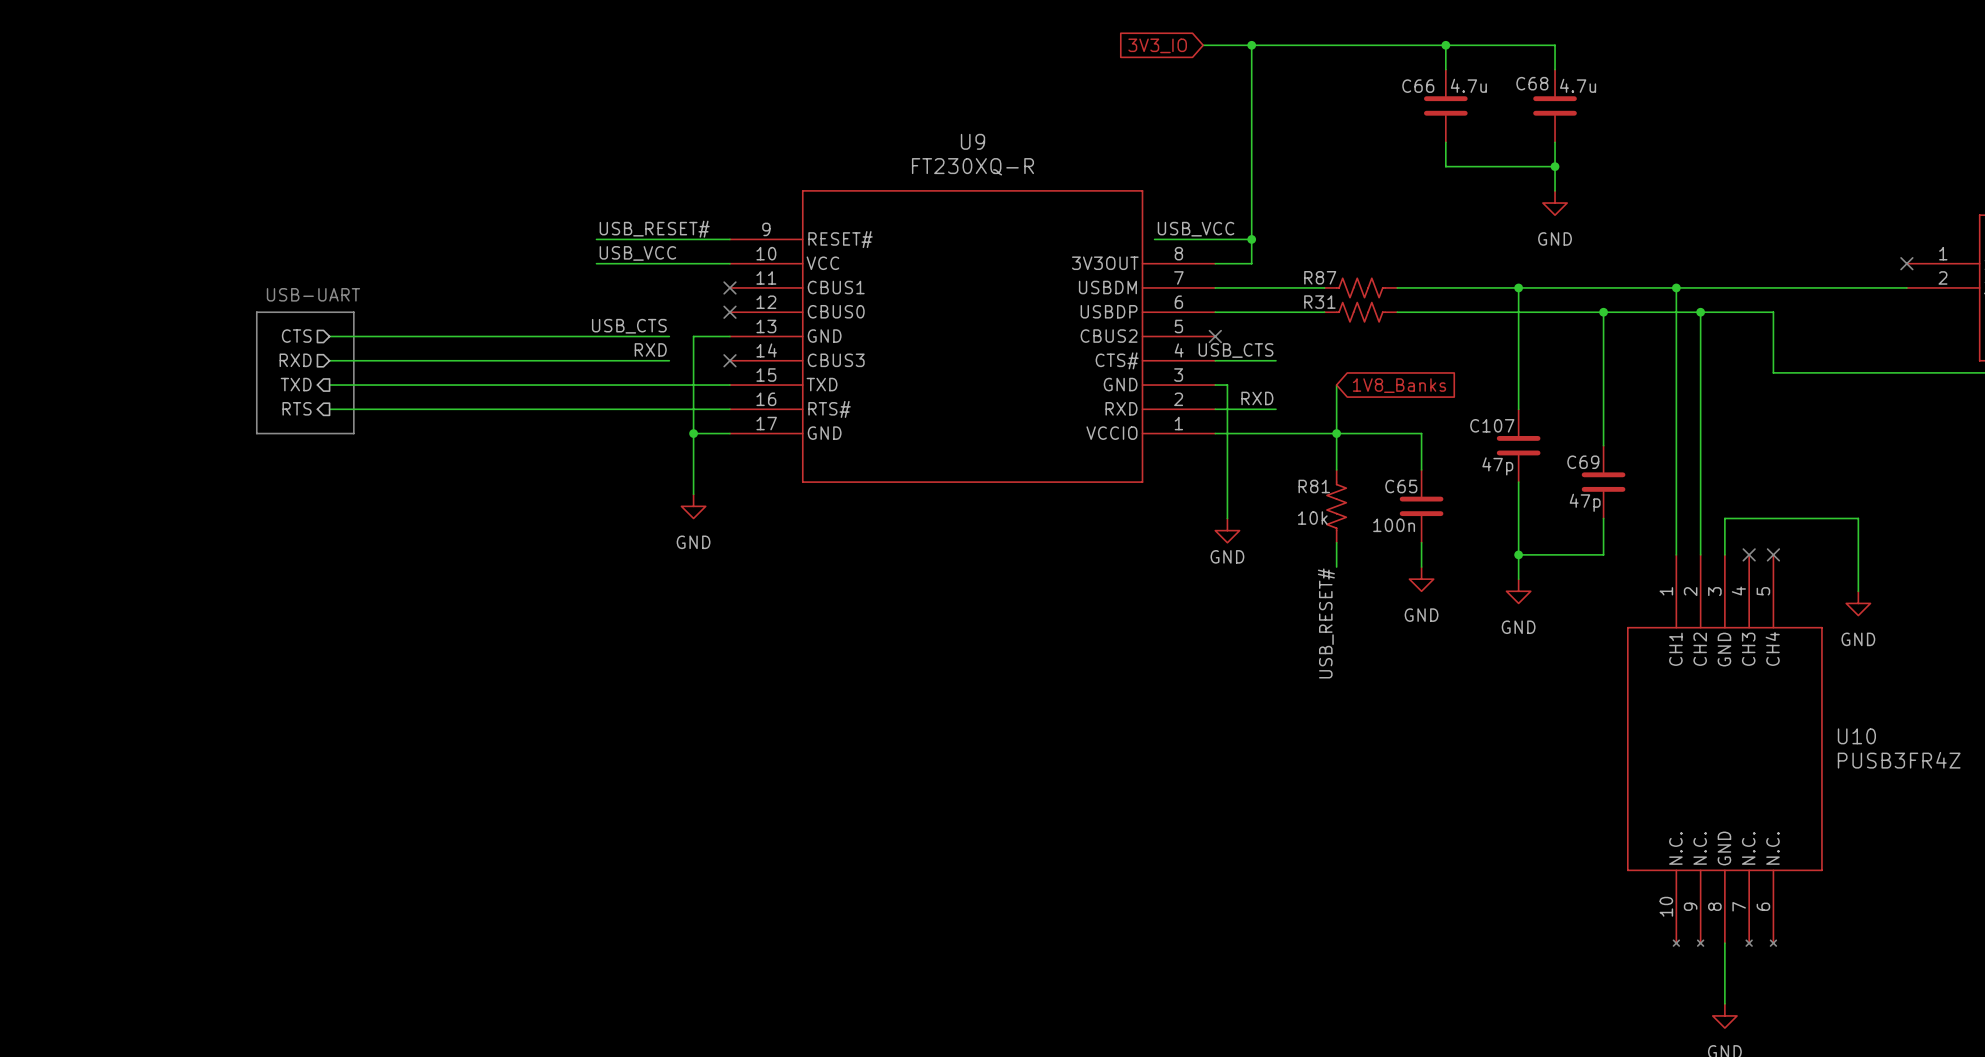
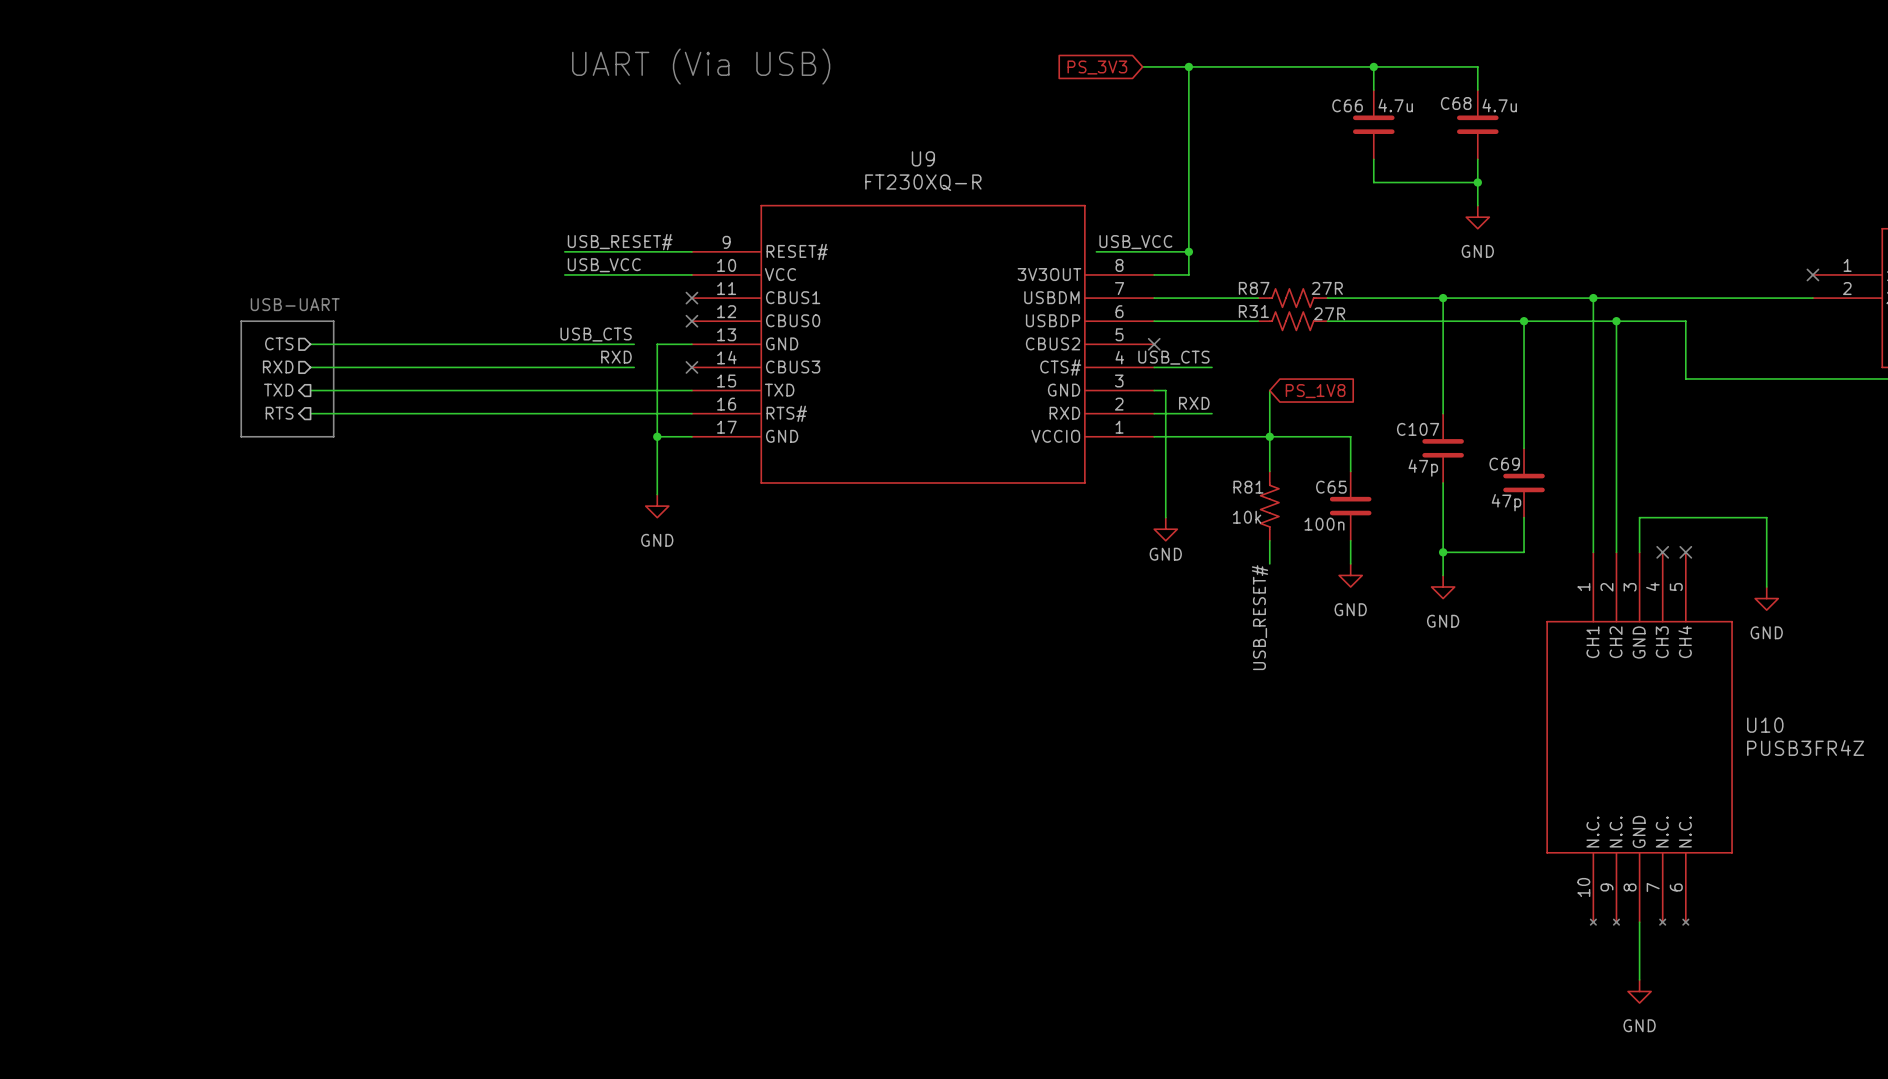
text: none -> UART (Via USB) (701, 66)
global label: 3V3_IO (1157, 45) -> PS_3V3 (1097, 67)
R87 value: none -> 27R (1327, 288)
R31 value: none -> 27R (1329, 313)
global label: 1V8_Banks (1399, 385) -> PS_1V8 (1315, 391)

